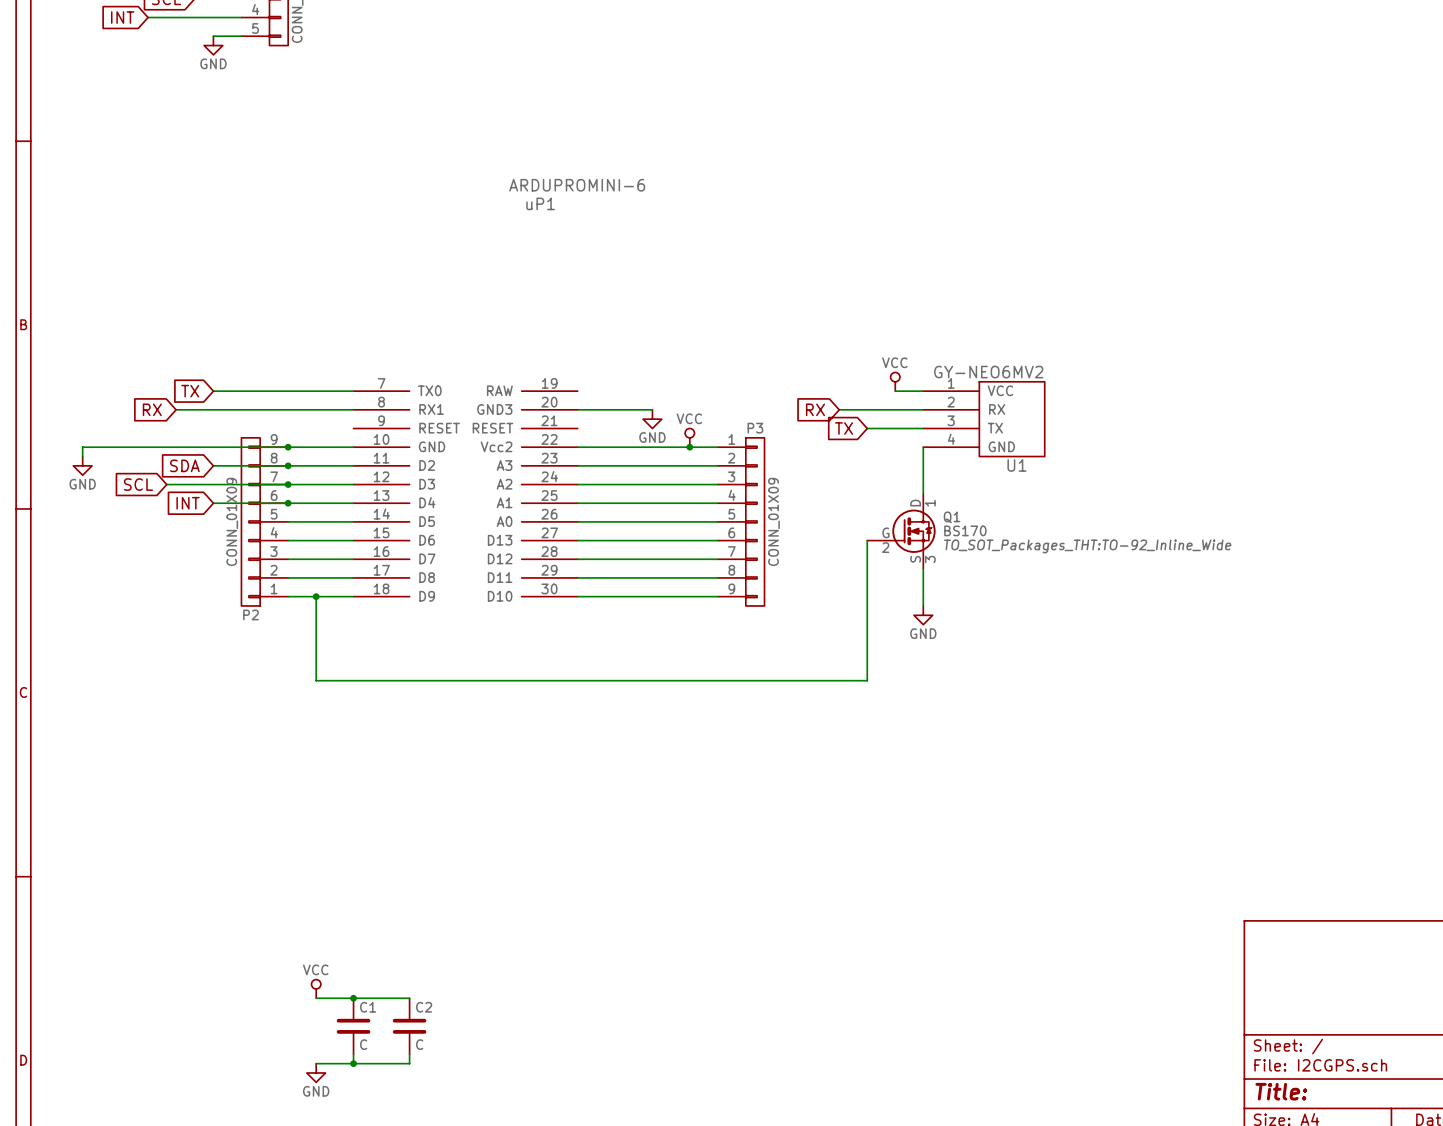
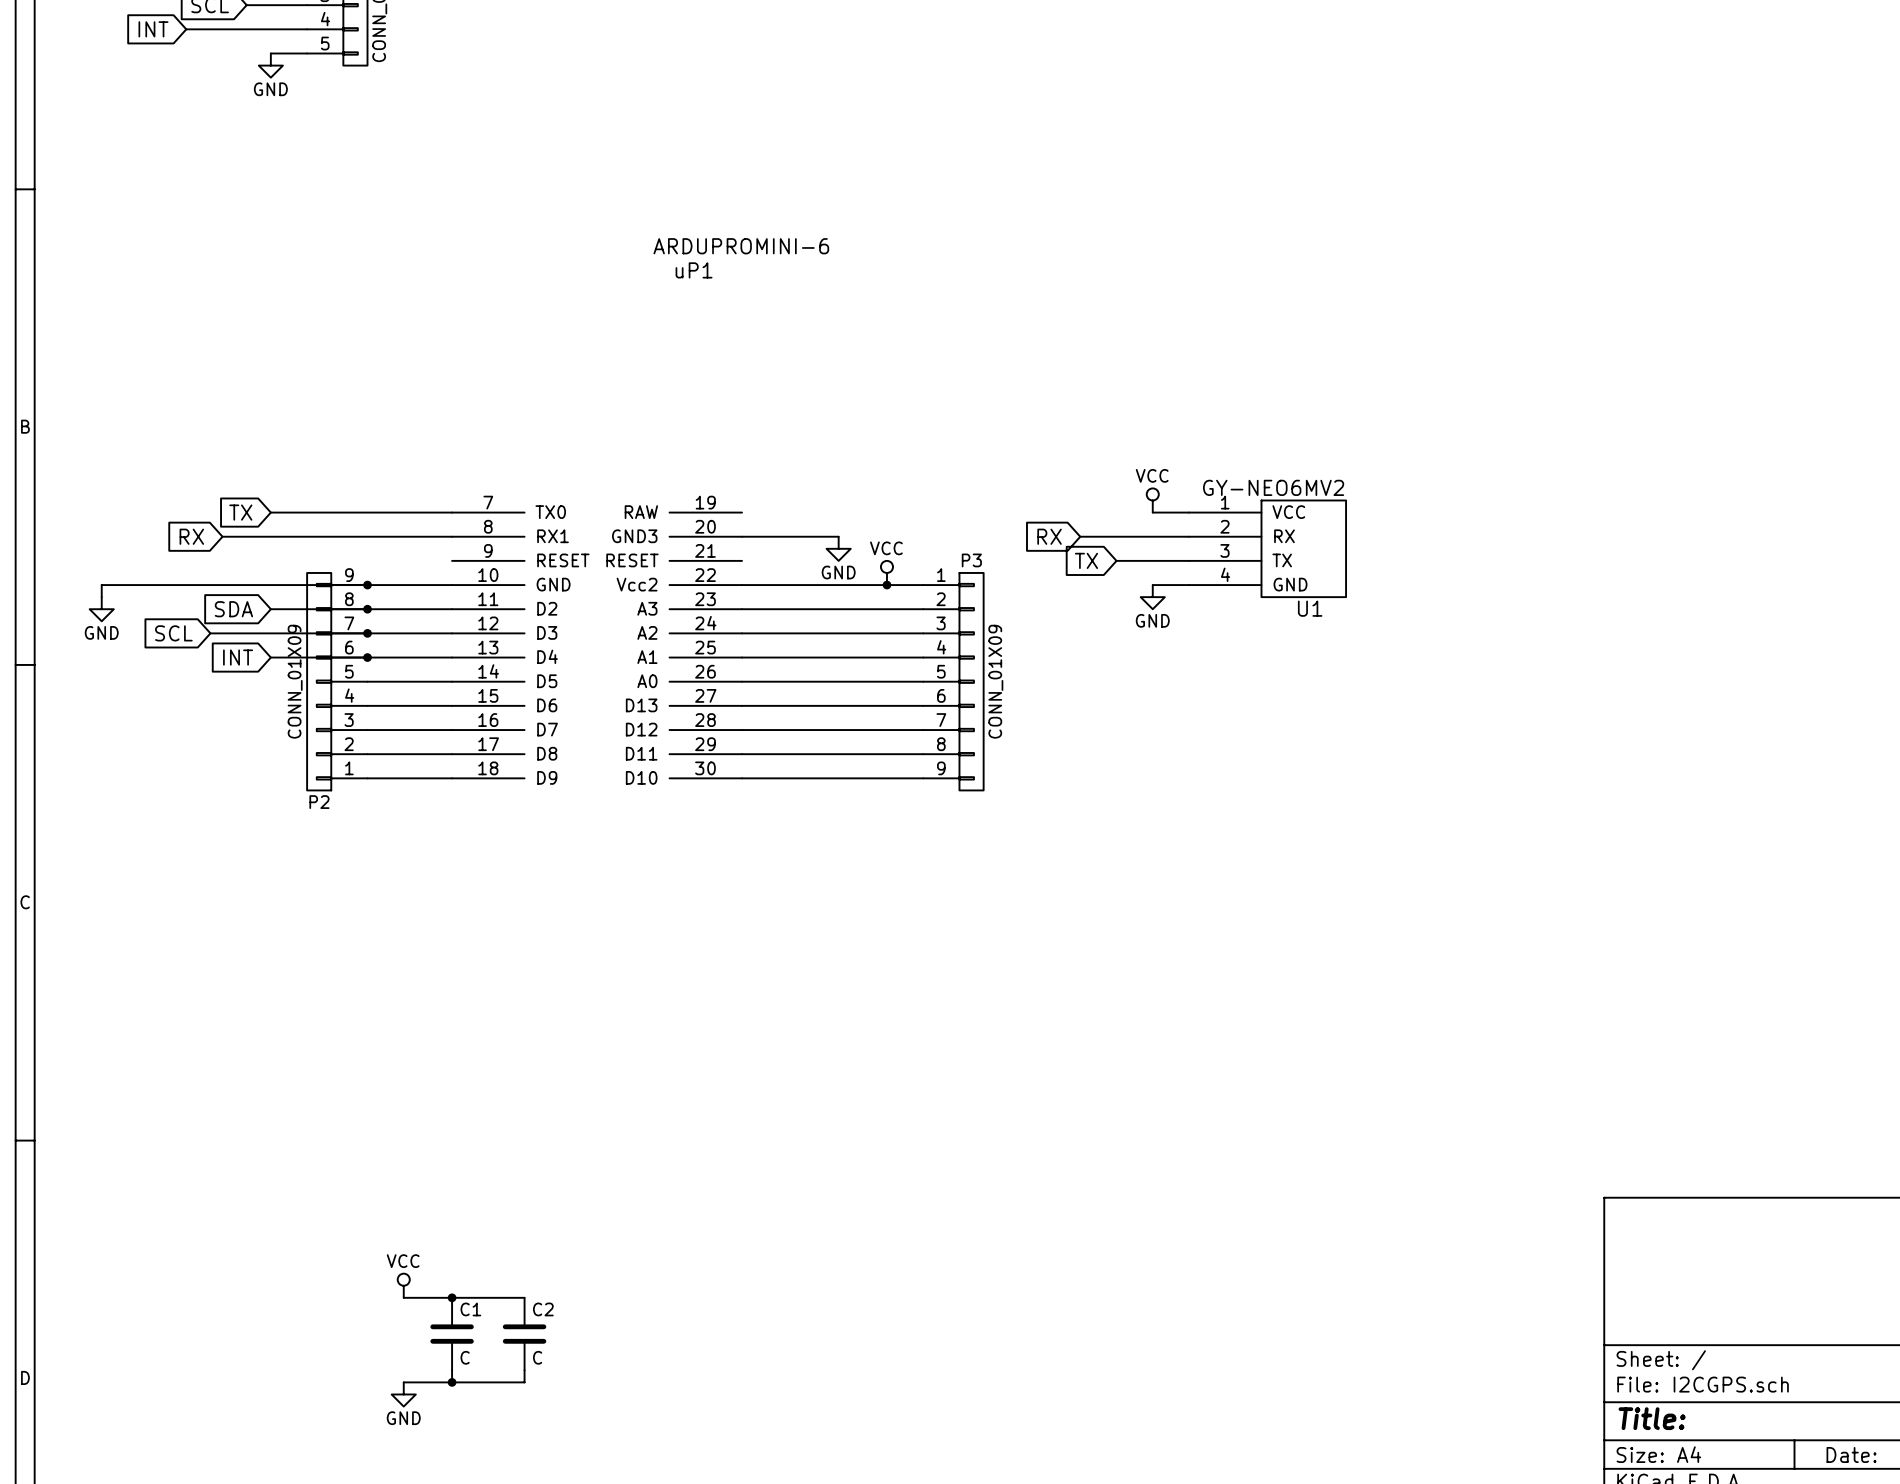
wire: (923, 447) (923, 493) -> (1189, 585) (1152, 585)
Q1: BS170 (901, 531) -> none
wire: (867, 540) (867, 680) (316, 680) (316, 596) -> none
wire: (923, 568) (923, 605) -> none
junction: (316, 596) -> none
power symbol position: GND (923, 615) -> GND (1152, 597)

